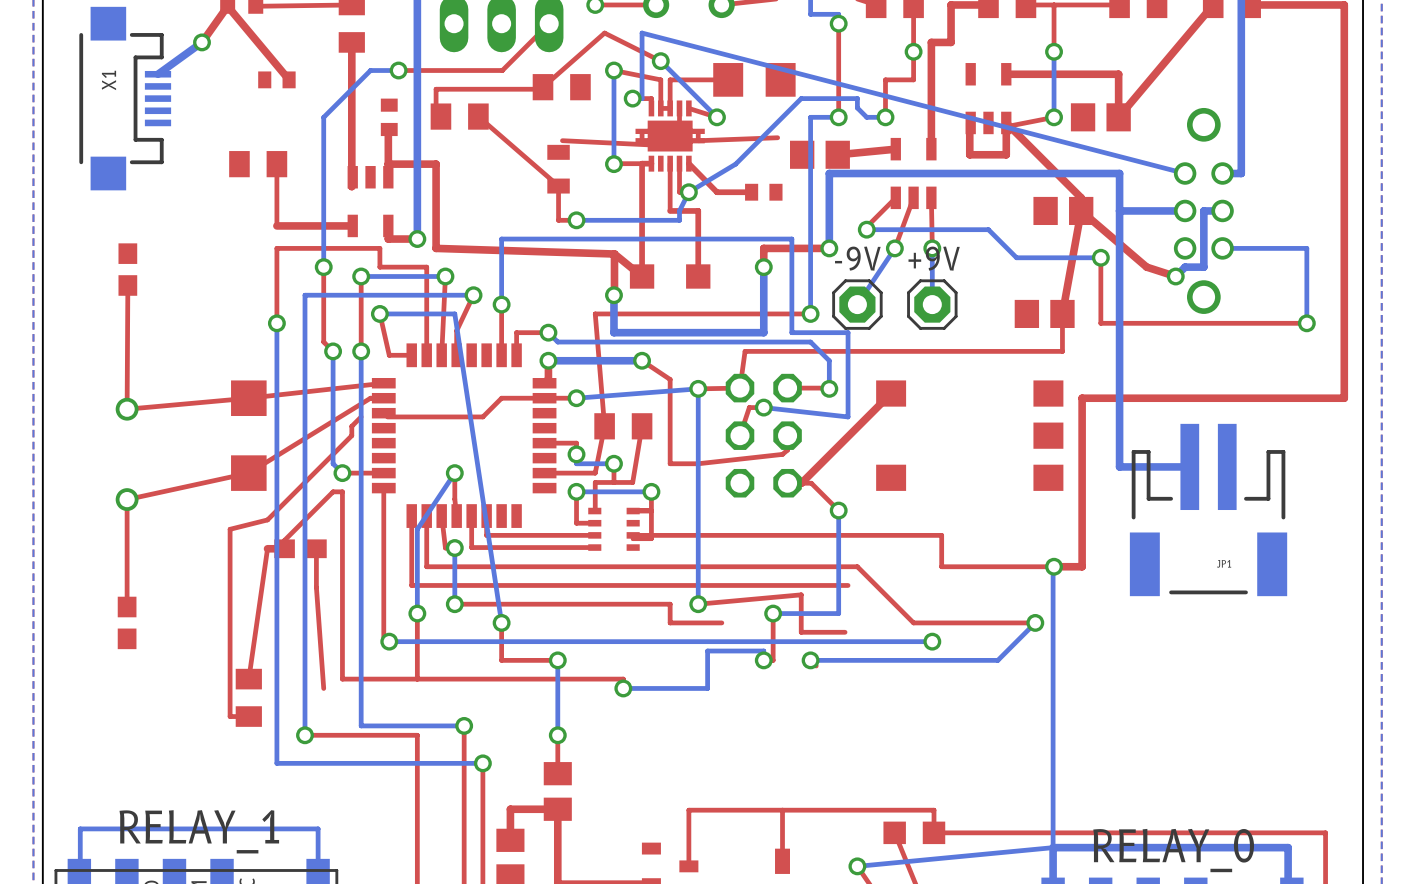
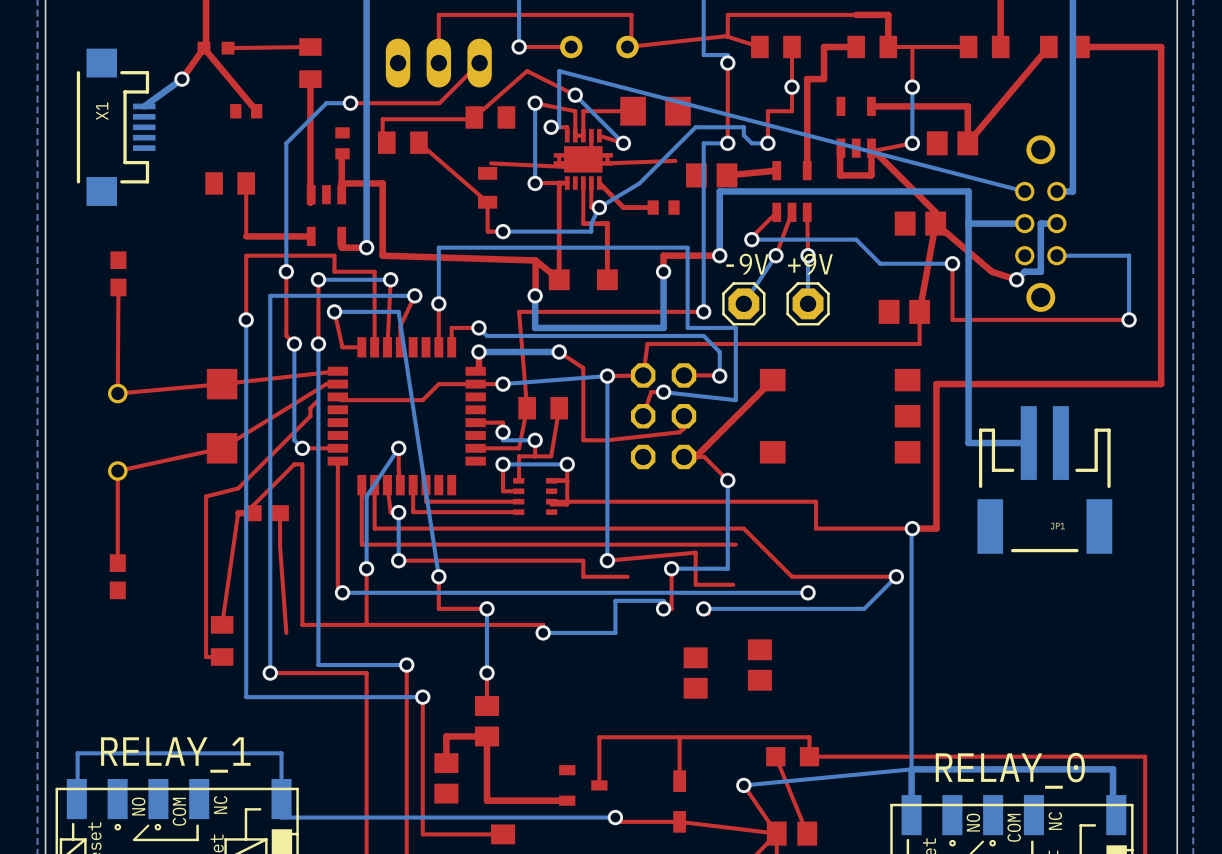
part: none -> (759, 665)
part: none -> (695, 673)

